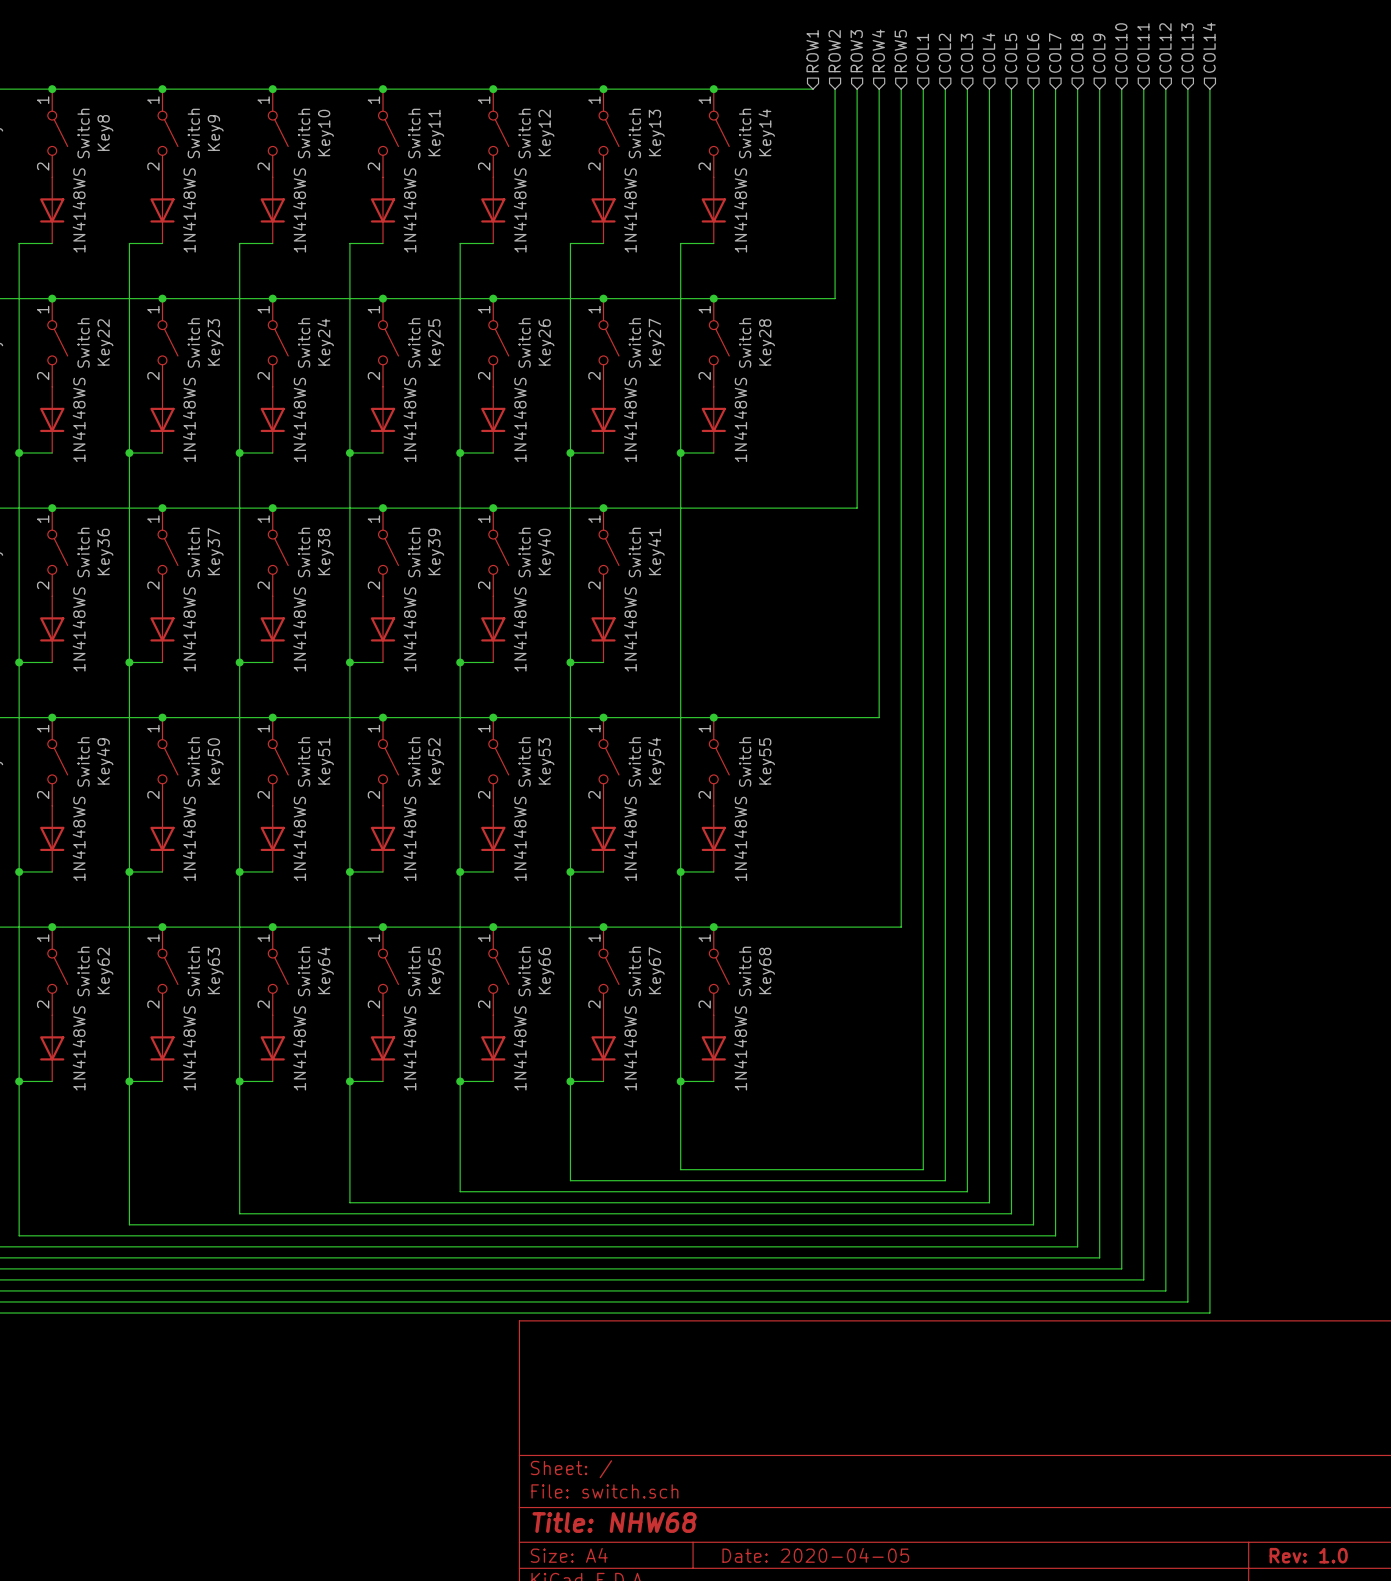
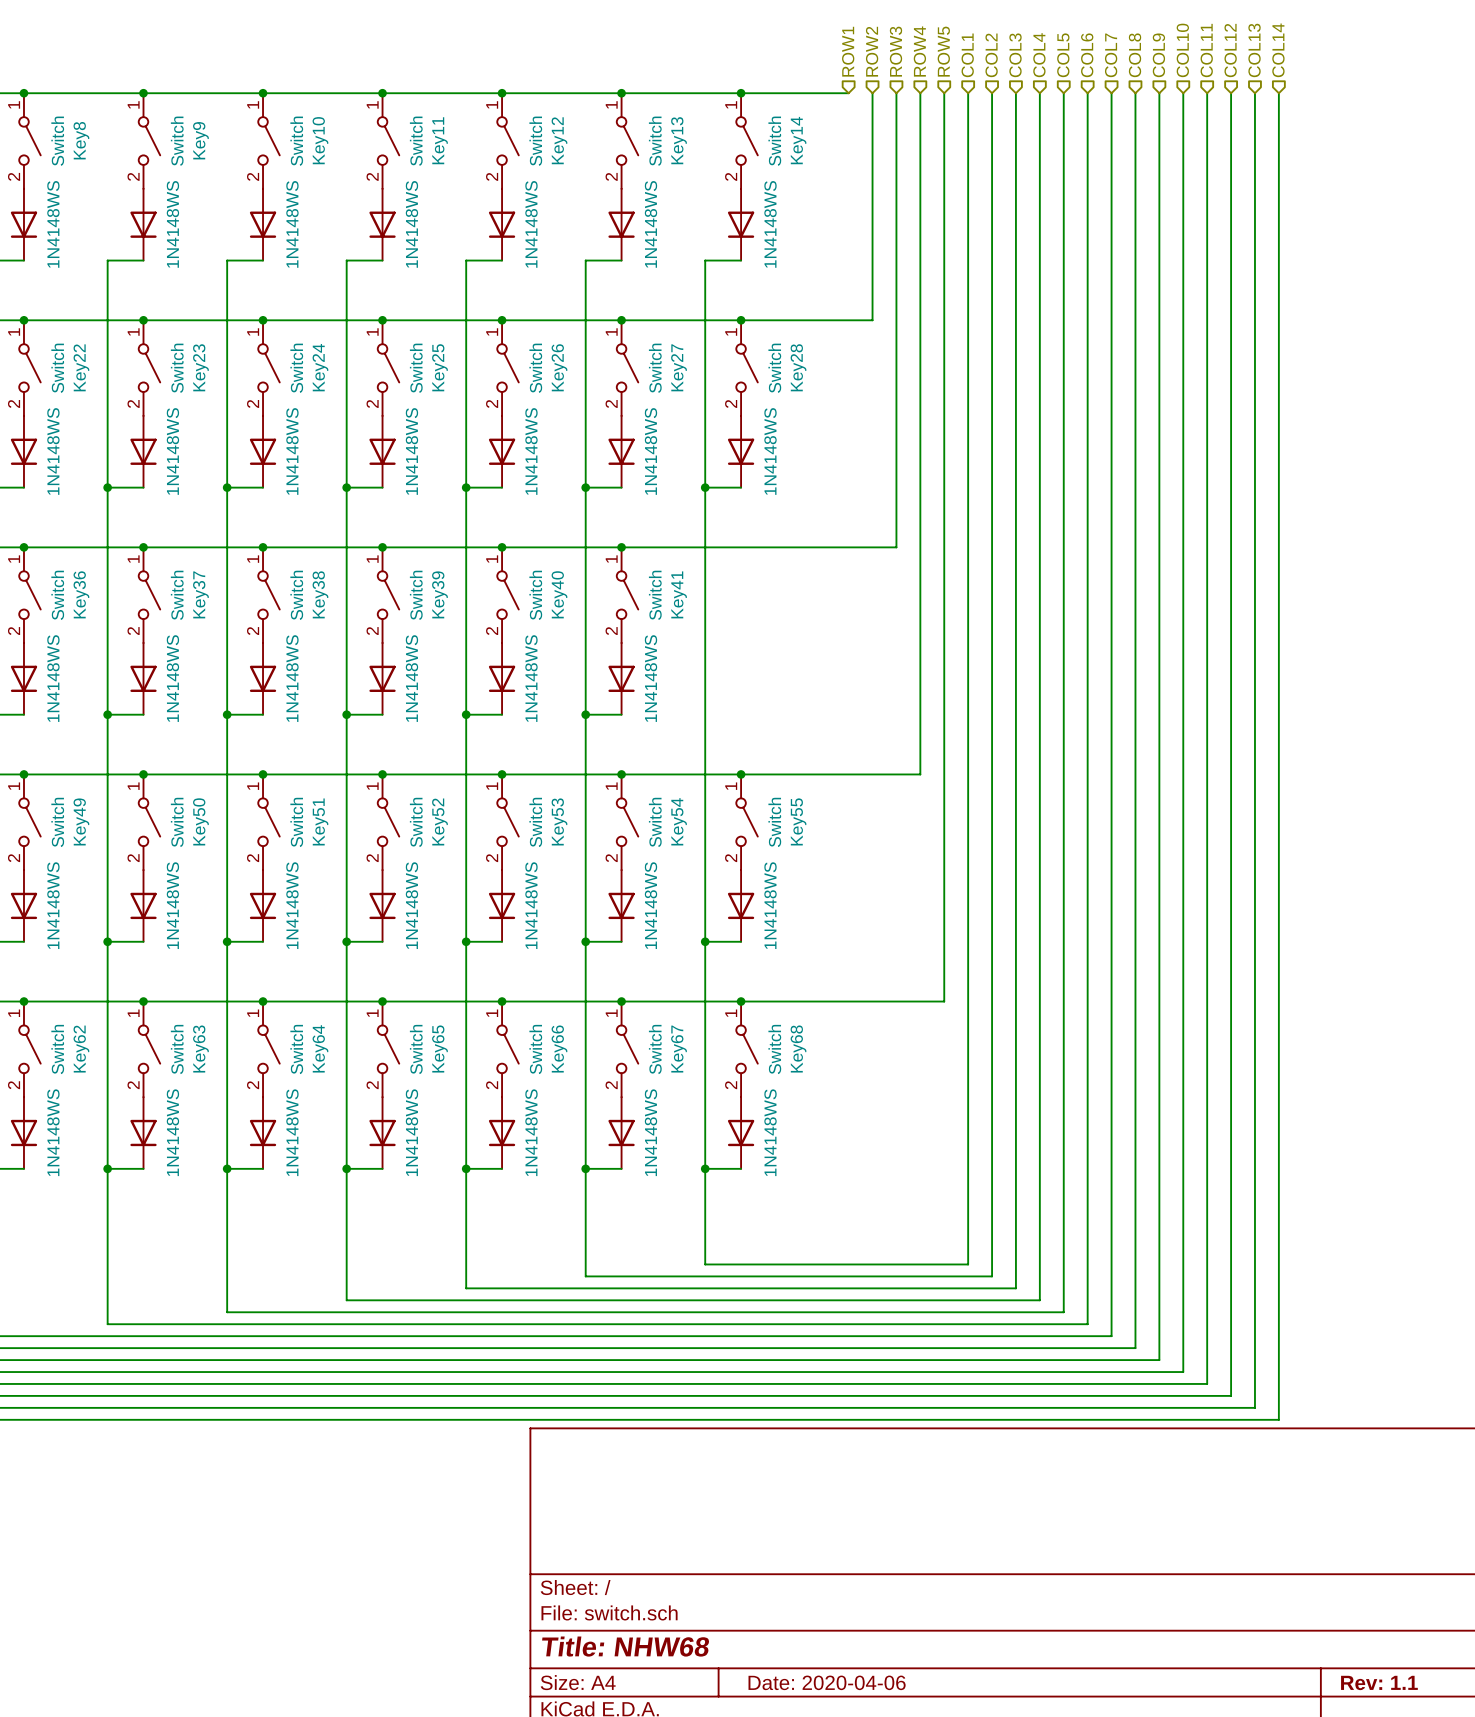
title block: Date: 2020-04-05 (815, 1555) -> Date: 2020-04-06 (827, 1682)
title block: Rev: 1.0 (1308, 1555) -> Rev: 1.1 (1379, 1682)

